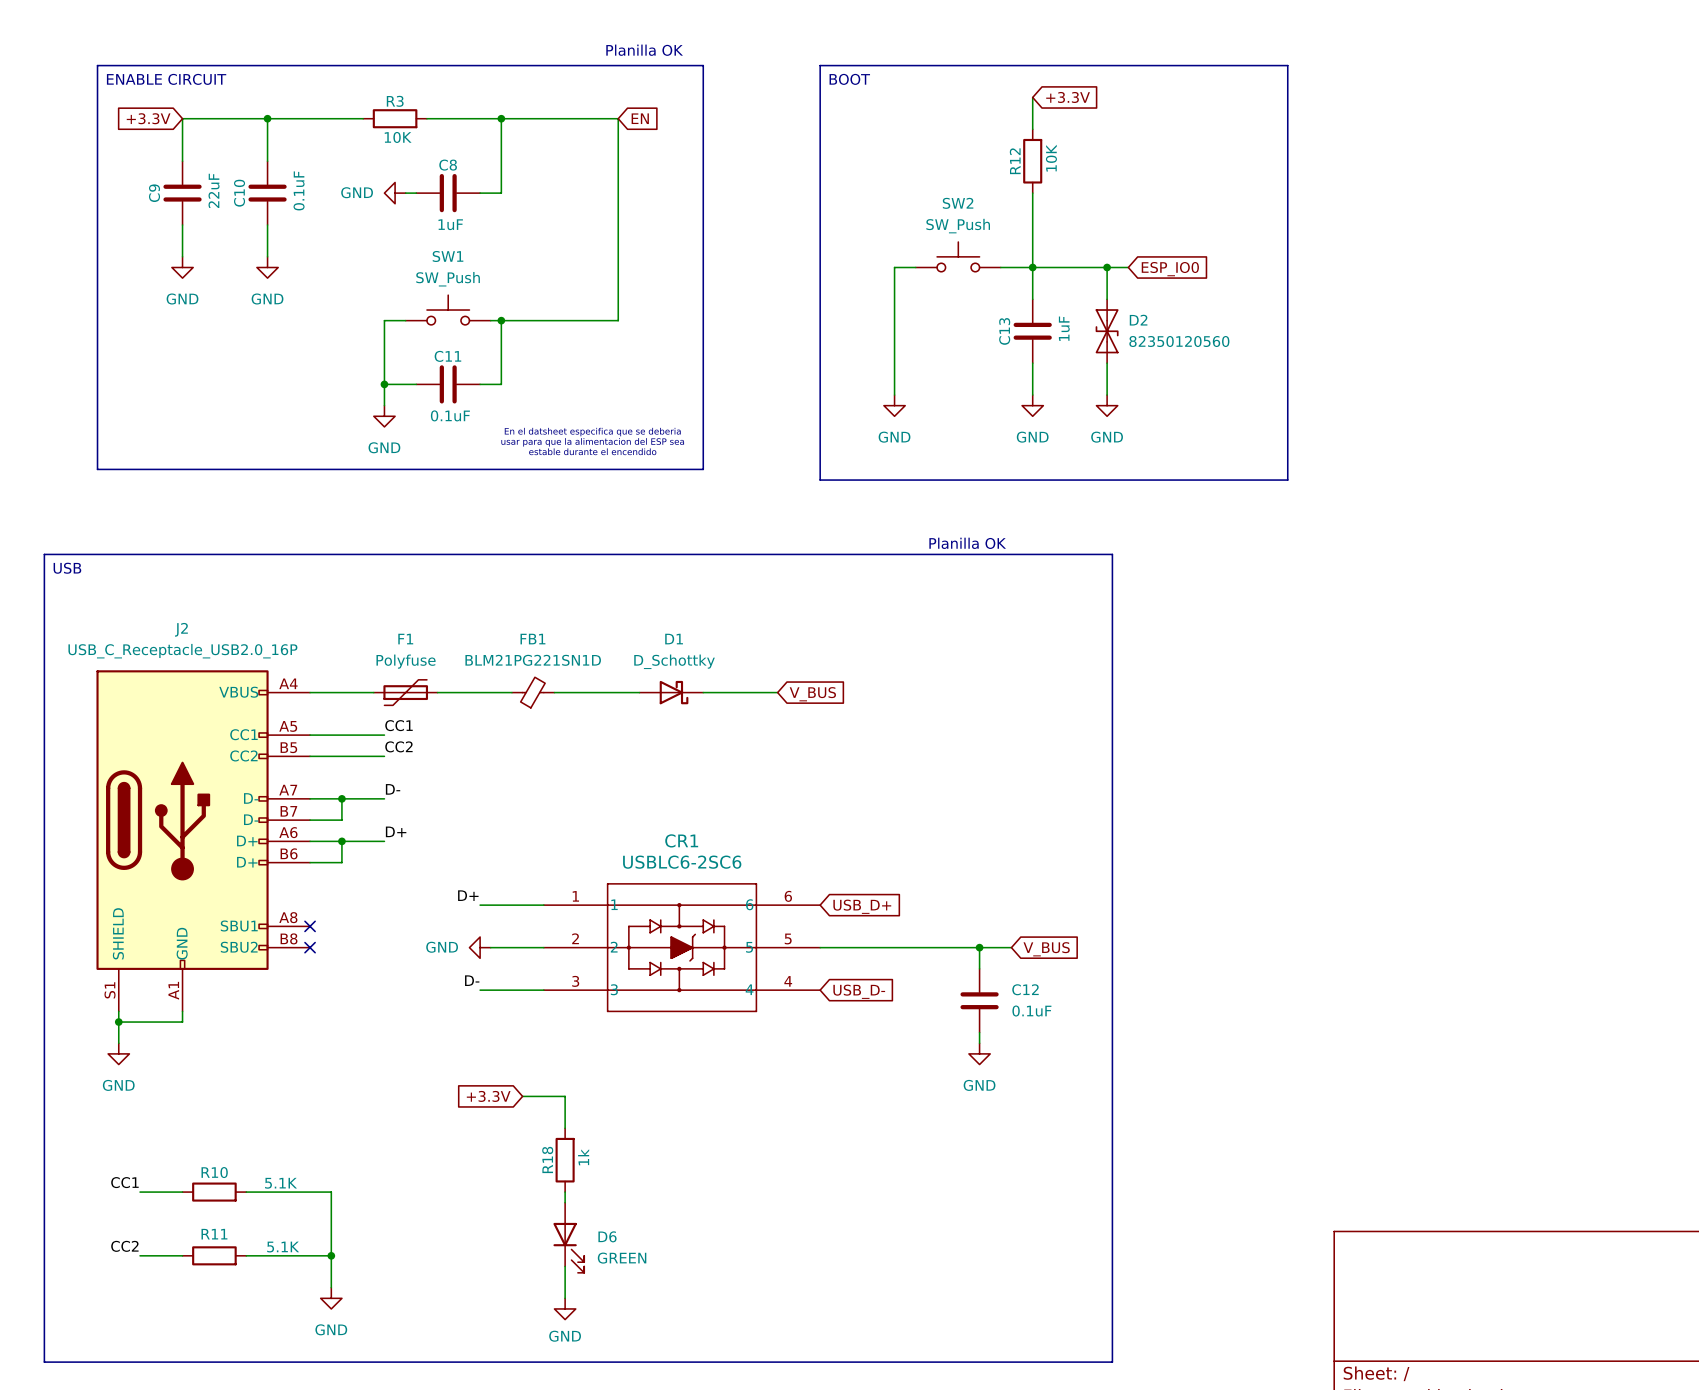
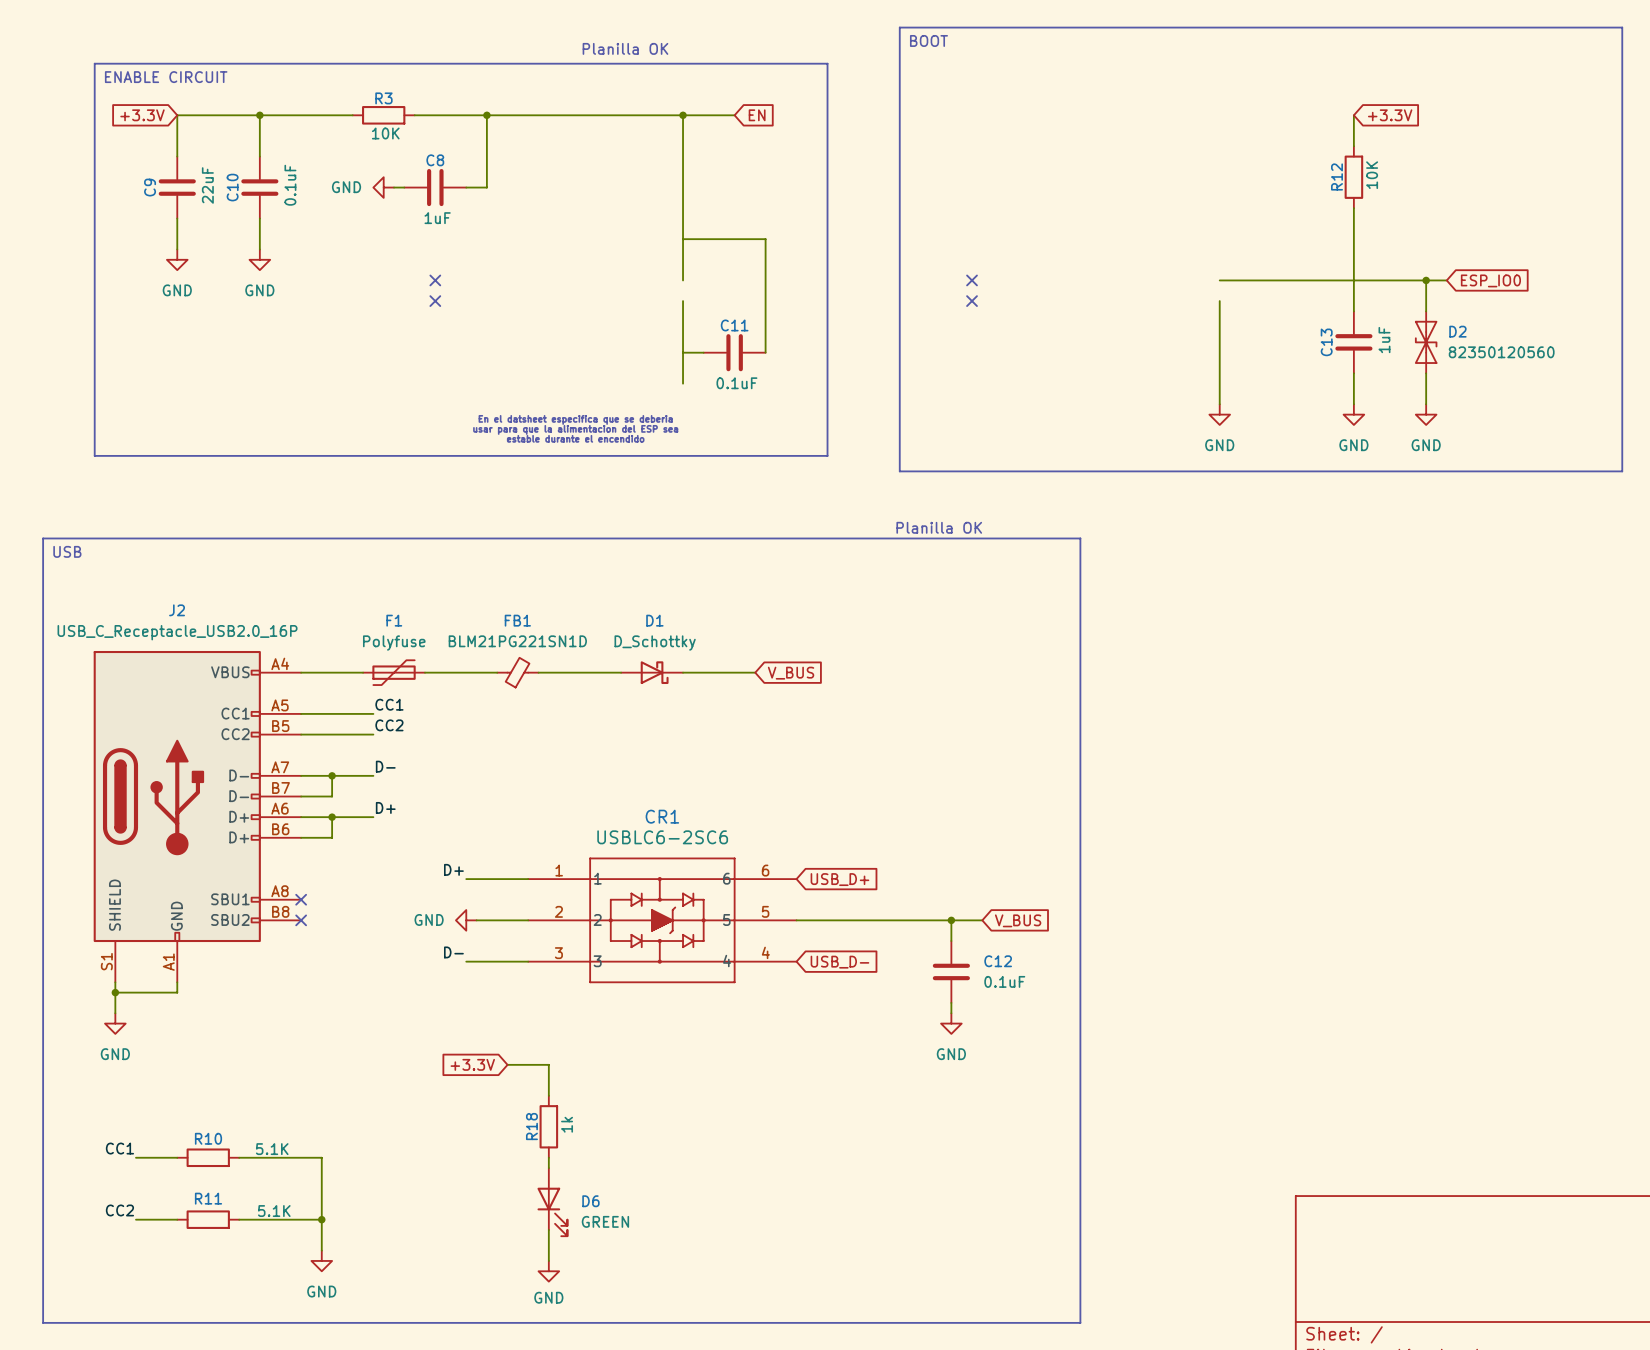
line: none -> (899, 27) (1622, 27) (1622, 471) (899, 471) (899, 27)
line: (703, 65) (703, 469) -> (827, 63) (827, 455) (683, 455)
line: (820, 65) (820, 480) (1287, 480) (1287, 65) (852, 65) -> (796, 63) (683, 63)
text position: BOOT (849, 79) -> BOOT (928, 40)
wire: (1032, 97) (1032, 129) -> none
global label: +3.3V (1068, 97) -> none
wire: (618, 118) (618, 320) (490, 320) -> (600, 115) (734, 115)
global label position: EN (640, 118) -> EN (757, 115)
junction: none -> (683, 115)
wire: none -> (1353, 115) (1353, 146)
global label: none -> +3.3V (1390, 115)
R12 position: (1032, 161) -> (1353, 177)
wire: (1032, 193) (1032, 299) -> none
wire: none -> (1353, 208) (1353, 311)
wire: none -> (683, 239) (765, 239) (765, 352)
SW2: SW_Push (958, 256) -> none
wire: (915, 267) (894, 267) (894, 395) -> none
wire: (1000, 267) (1128, 267) -> none
junction: (1032, 267) -> none
wire: (1107, 267) (1107, 299) -> none
junction: (1107, 267) -> none
global label: ESP_IO0 (1170, 269) -> none
no-connect mark: none -> (435, 280)
no-connect mark: none -> (972, 280)
wire: none -> (1219, 280) (1446, 280)
wire: none -> (1426, 280) (1426, 311)
junction: none -> (1426, 280)
global label: none -> ESP_IO0 (1490, 280)
SW1: SW_Push (448, 310) -> none
no-connect mark: none -> (435, 301)
no-connect mark: none -> (972, 301)
wire: none -> (1219, 301) (1219, 404)
wire: (405, 320) (384, 320) (384, 405) -> none
wire: (501, 320) (501, 384) (480, 384) -> none
junction: (501, 320) -> none
C13 position: (1032, 331) -> (1353, 342)
D2 position: (1107, 331) -> (1426, 342)
wire: none -> (683, 352) (703, 352)
wire: (1032, 363) (1032, 395) -> none
wire: (1107, 363) (1107, 395) -> none
wire: (384, 384) (416, 384) -> none
junction: (384, 384) -> none
C11 position: (448, 384) -> (734, 352)
wire: none -> (1353, 373) (1353, 404)
wire: none -> (1426, 373) (1426, 404)
power symbol: GND (894, 405) -> none
power symbol: GND (1032, 405) -> none
power symbol: GND (1107, 405) -> none
power symbol: GND (384, 416) -> none
power symbol: none -> GND (1219, 414)
power symbol: none -> GND (1353, 414)
power symbol: none -> GND (1426, 414)

